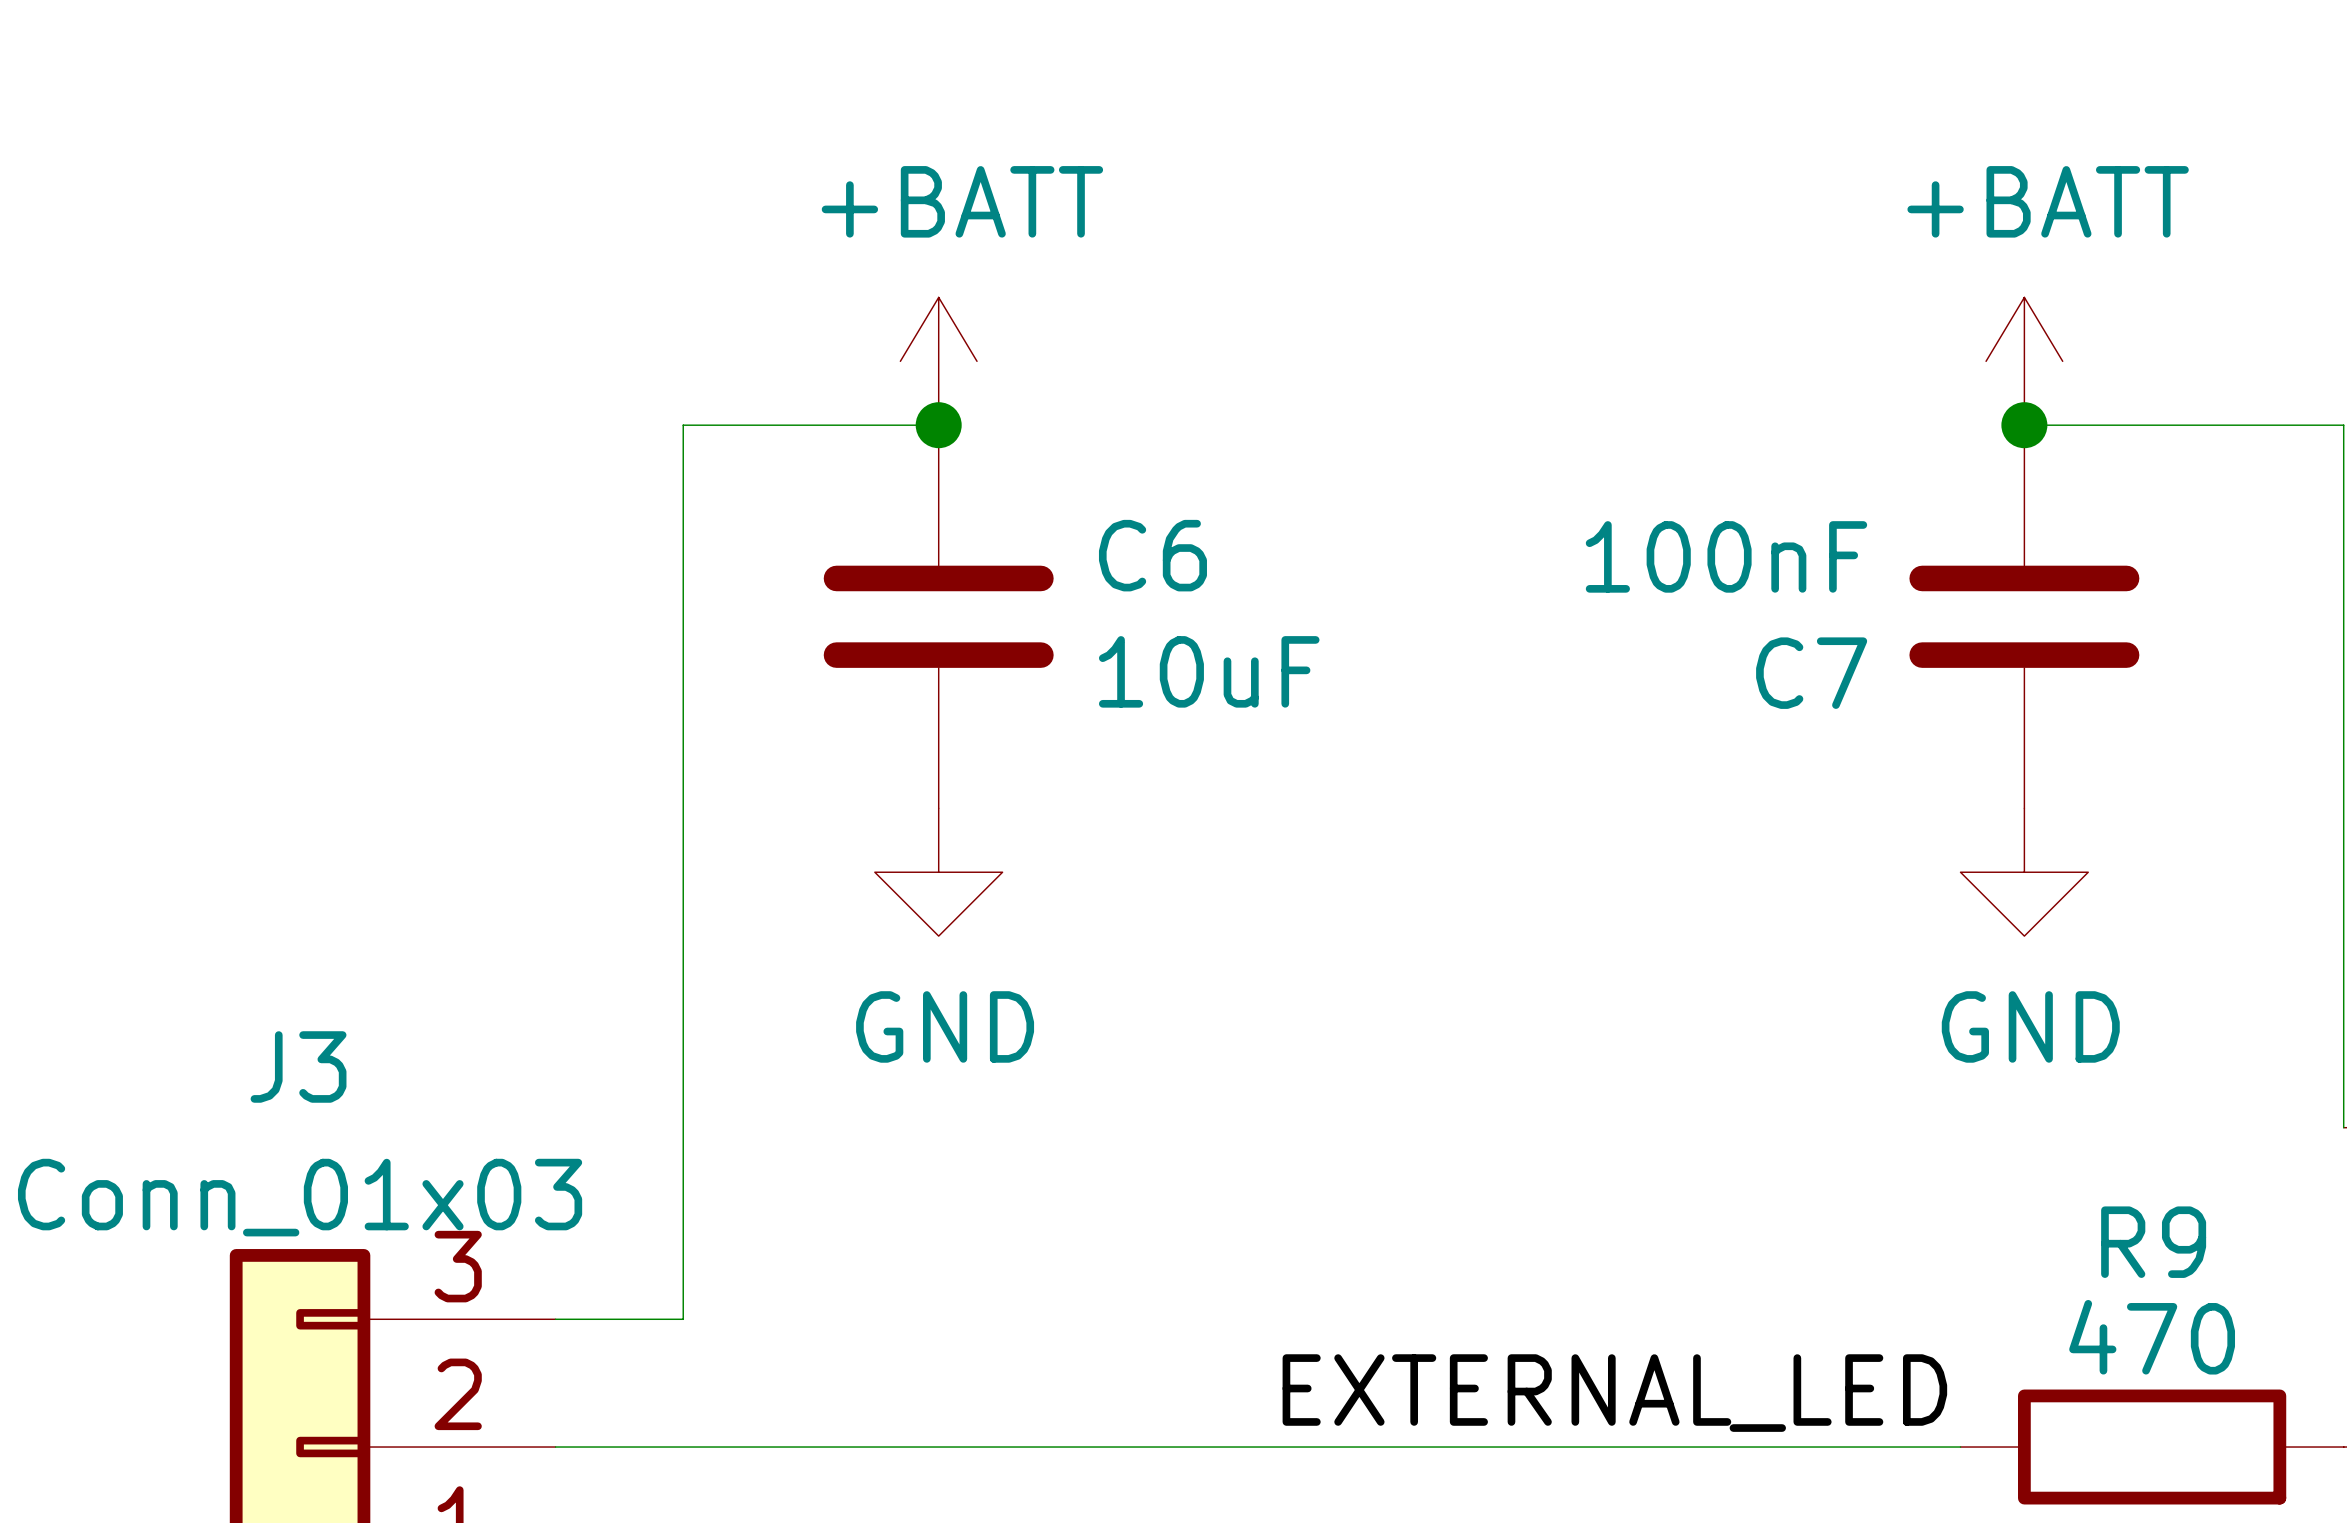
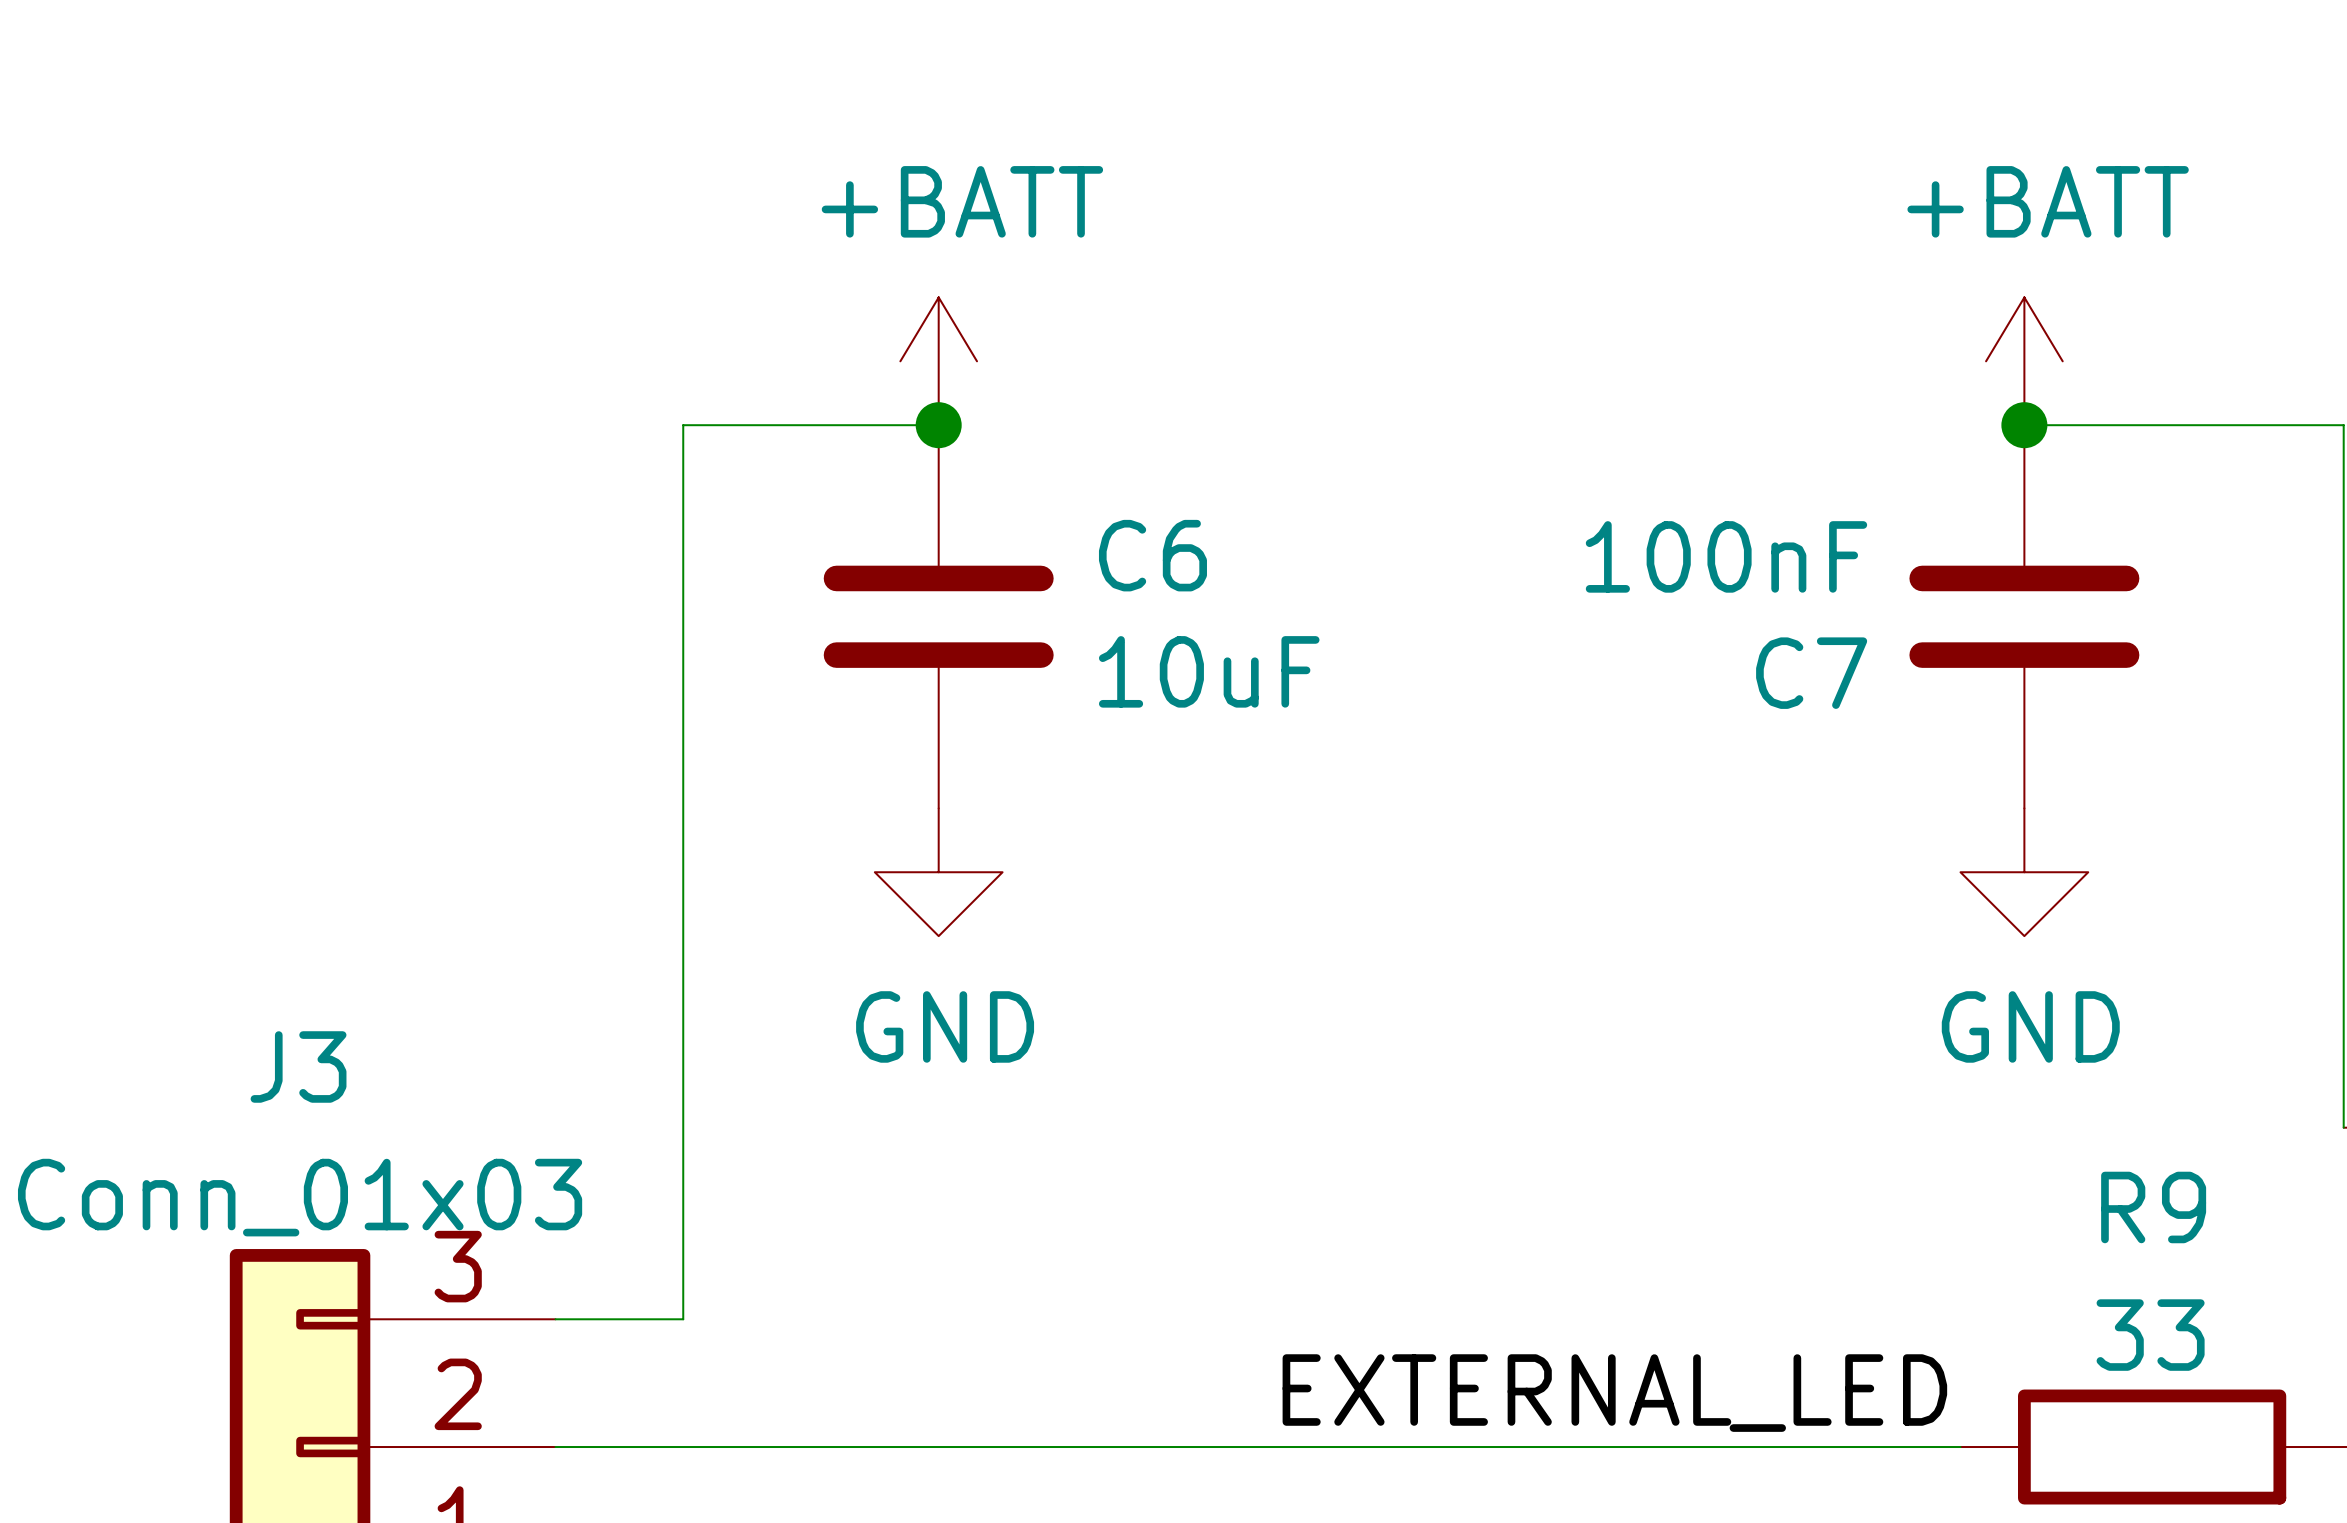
R9 name position: R9 (2153, 1242) -> R9 (2153, 1207)
R9 value: 470 (2152, 1337) -> 33 (2150, 1335)

